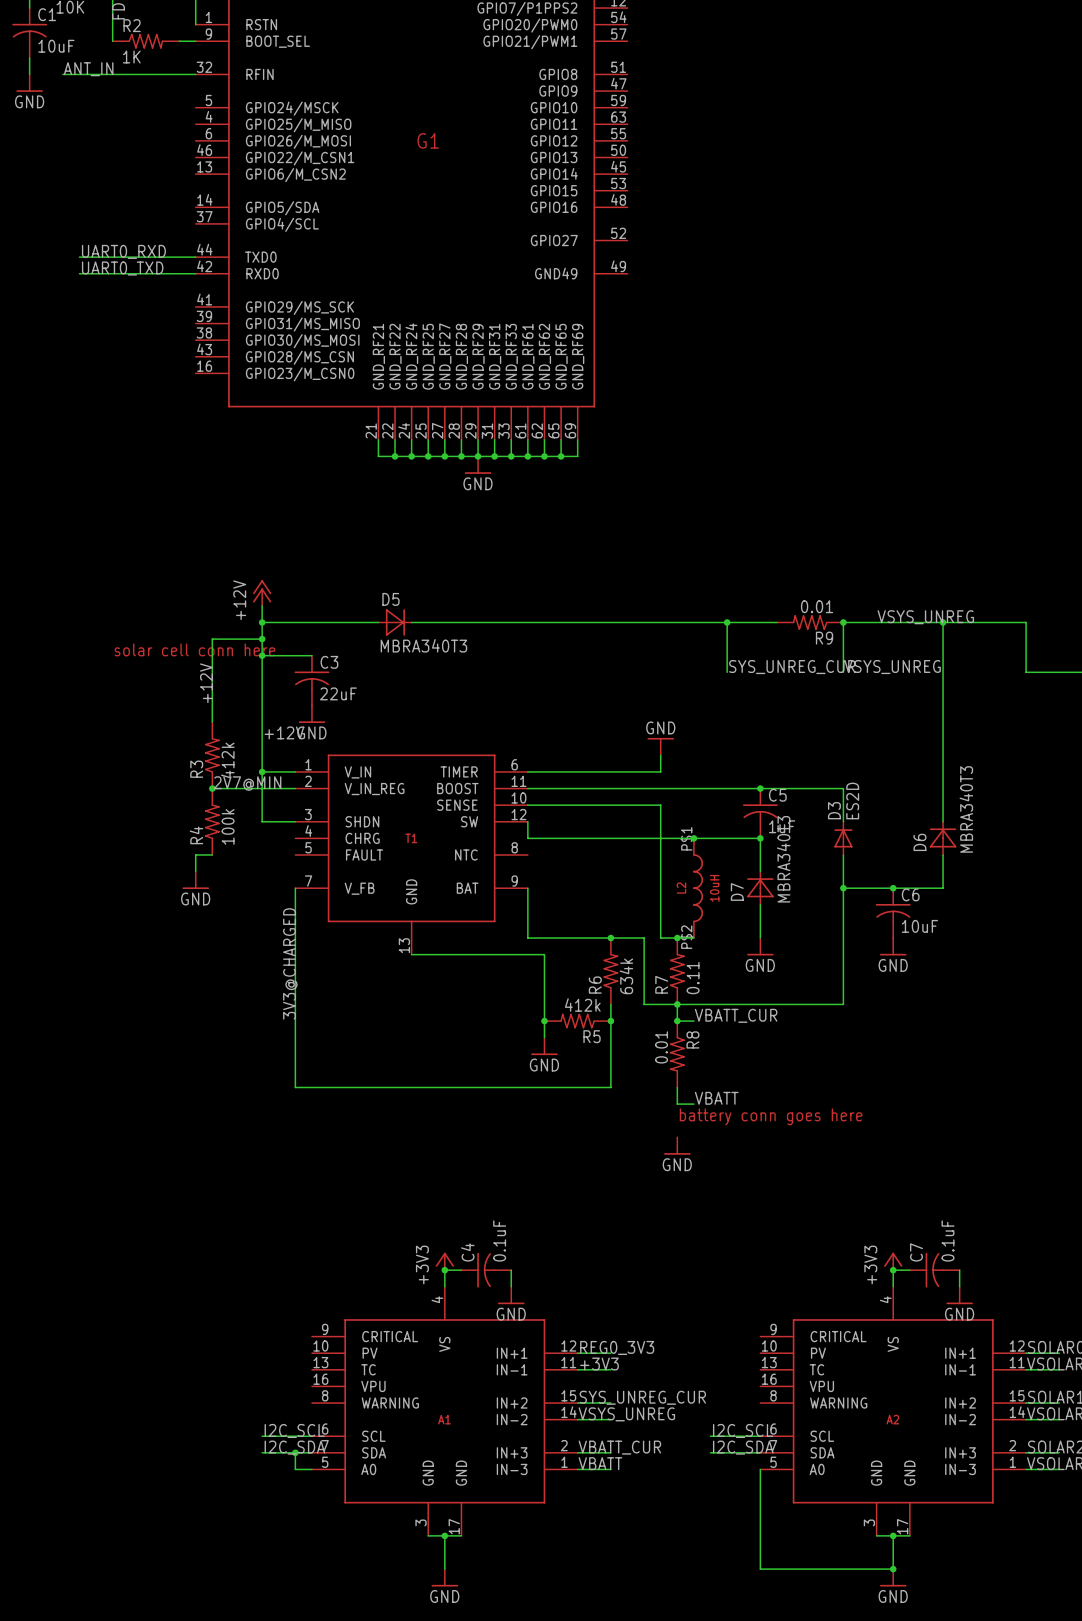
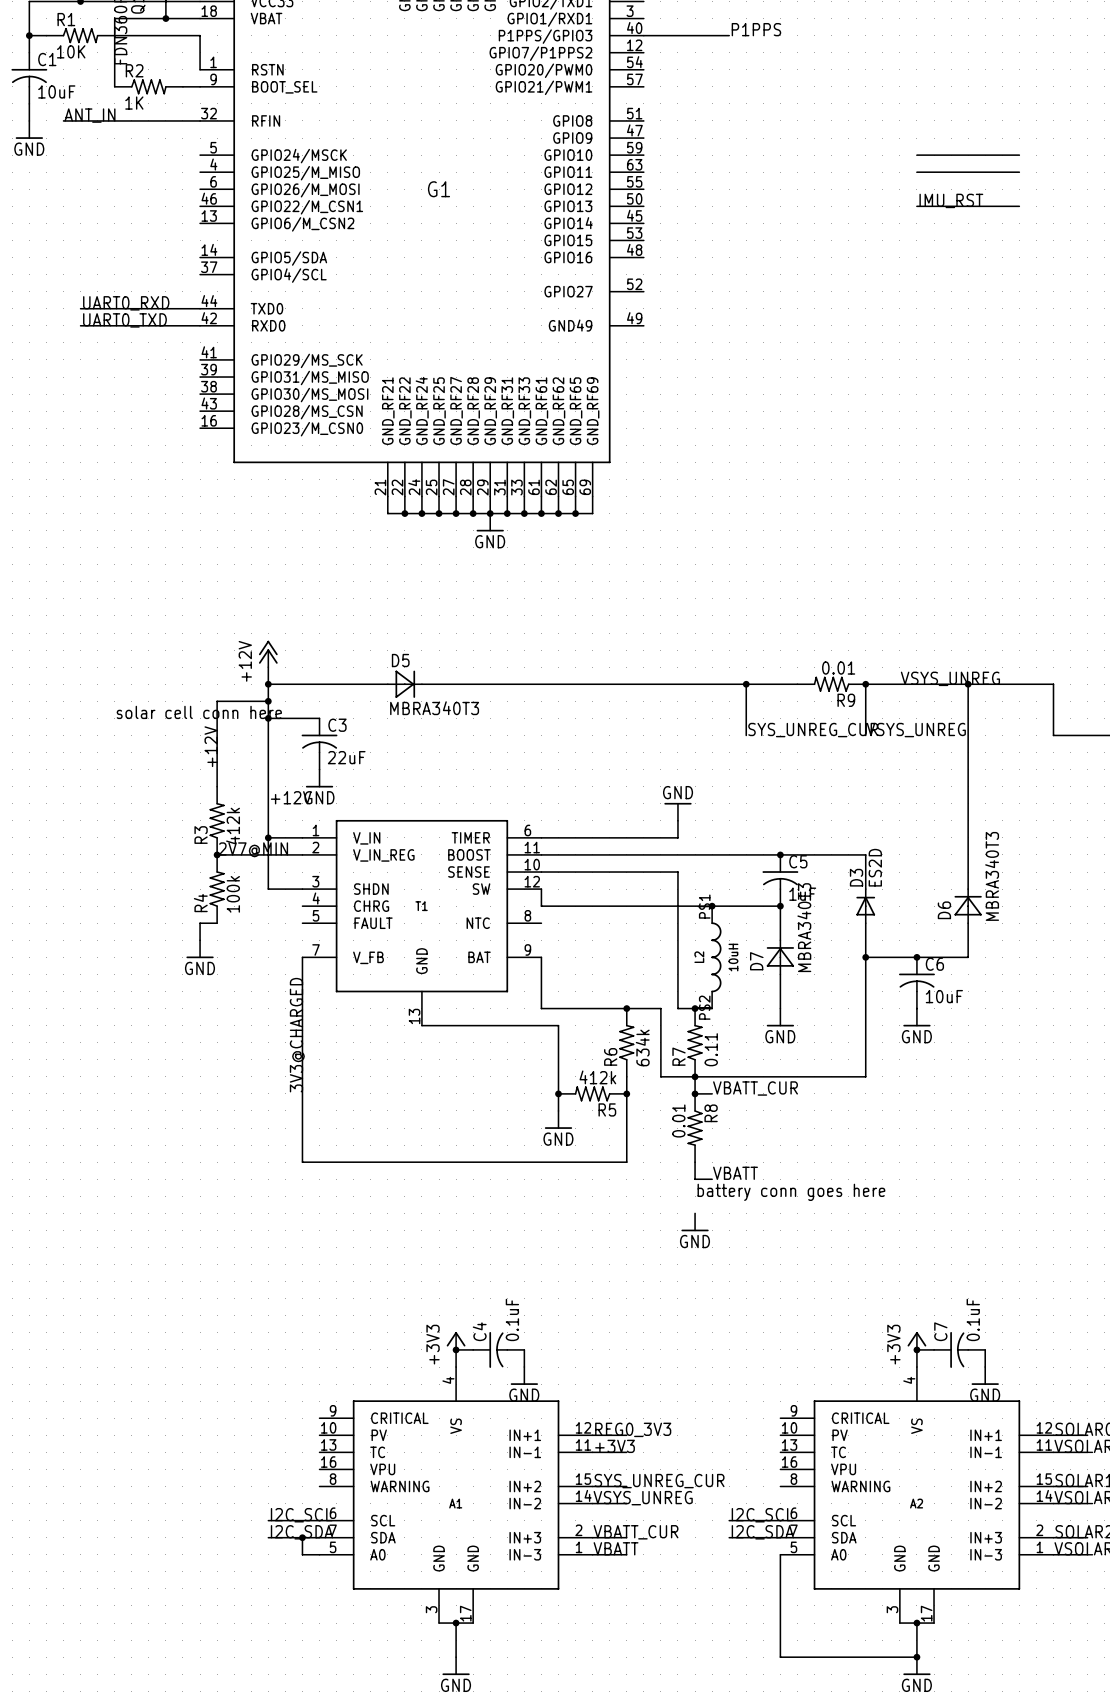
wire: none -> (916, 155) (1019, 155)
wire: none -> (916, 172) (1019, 172)
label: none -> IMU_RST (951, 200)
wire: none -> (916, 206) (1019, 206)

